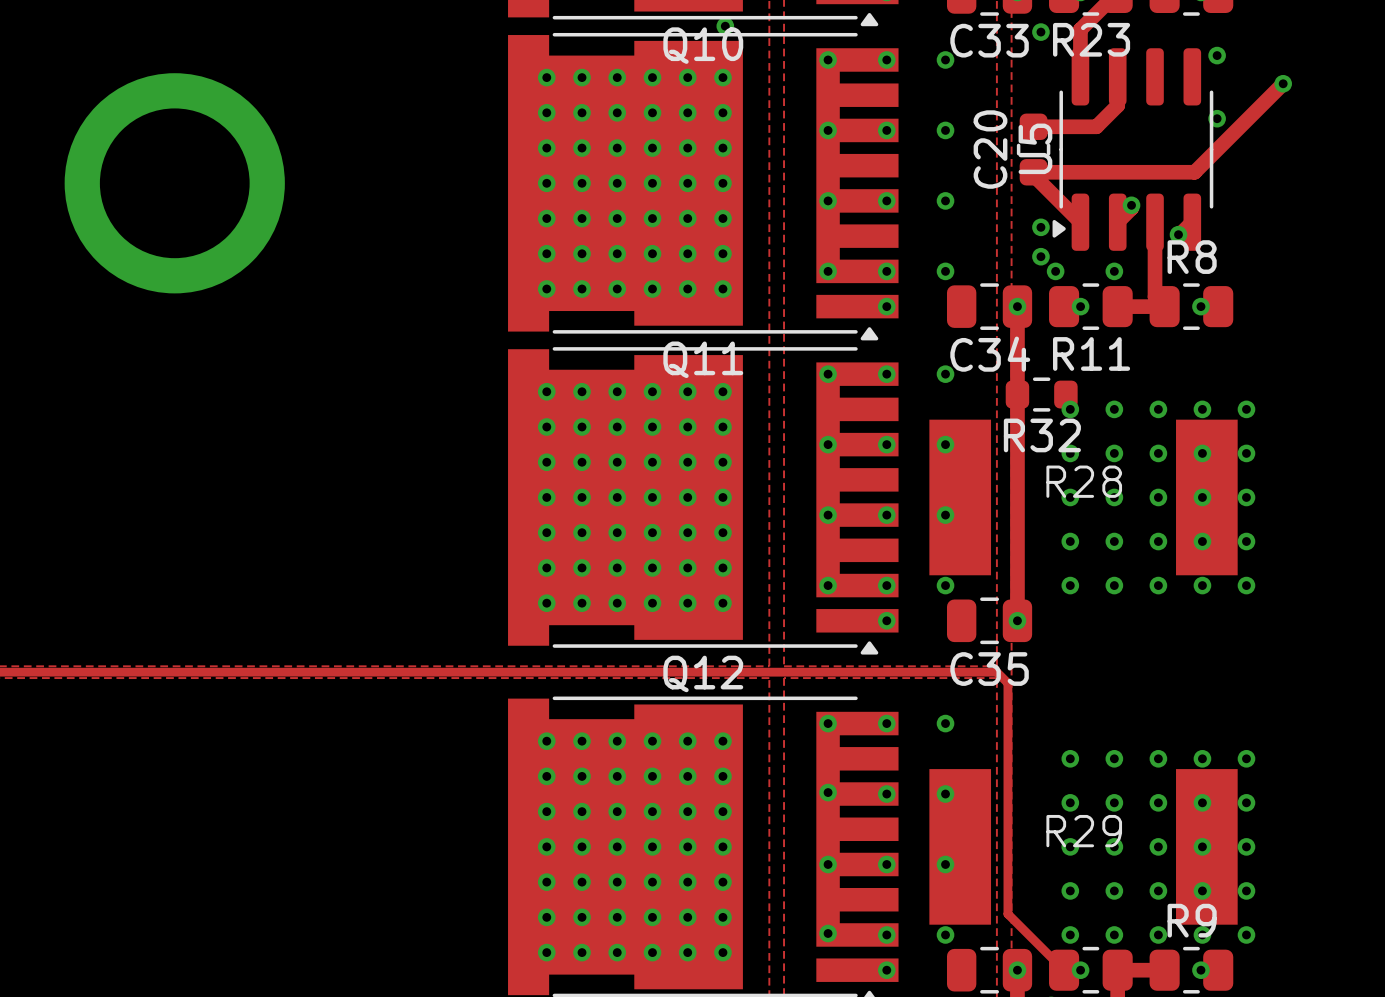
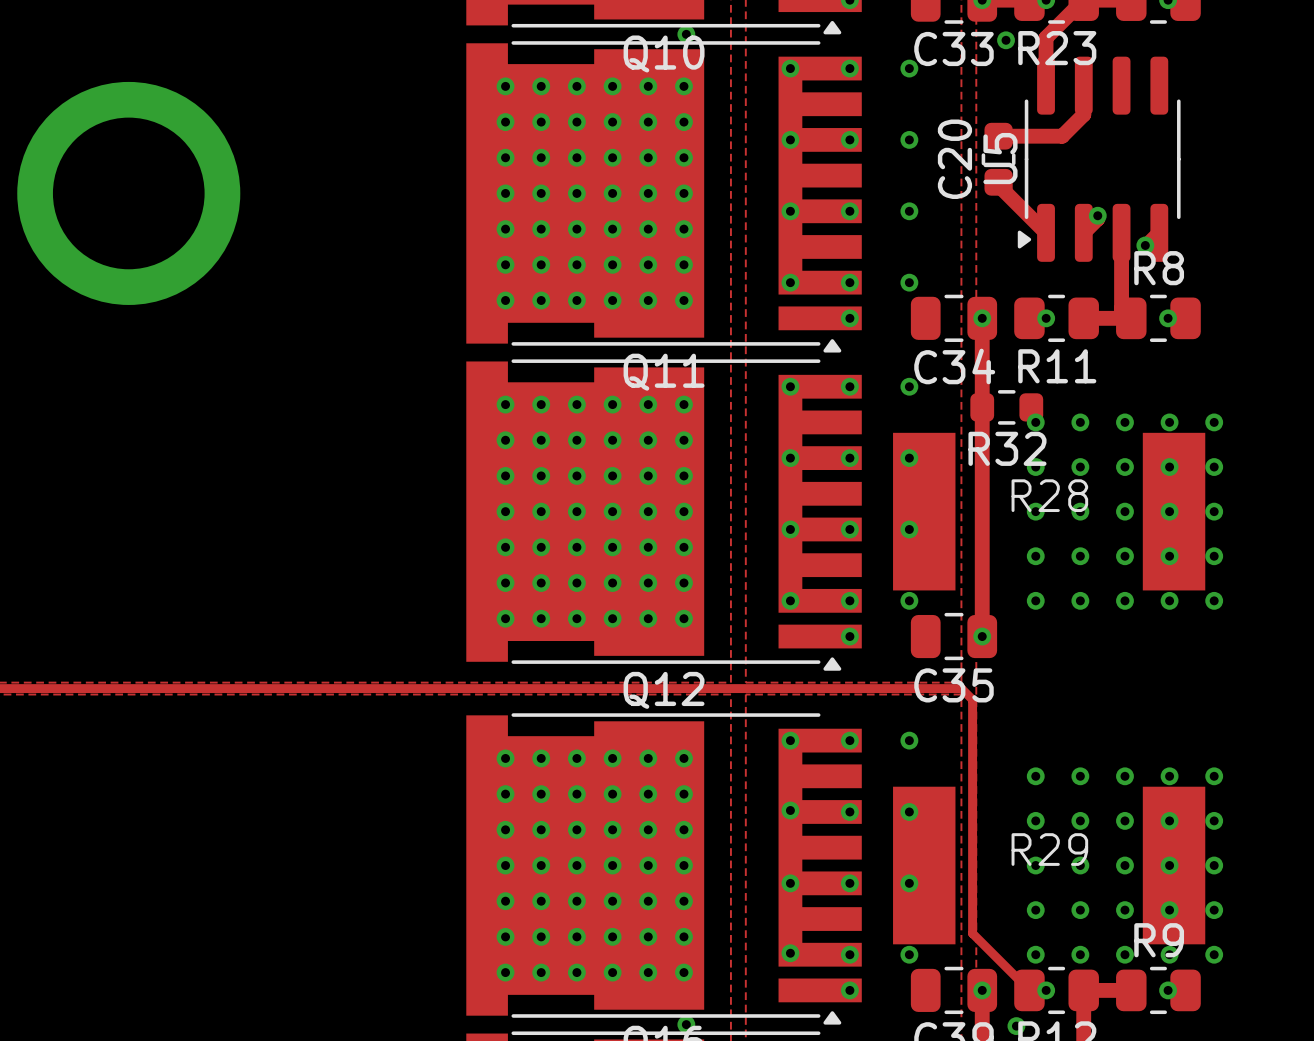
via: (1217, 55) -> none
track: (1283, 83) (1194, 172) (1033, 172) -> none
via: (1283, 83) -> none
via: (1217, 118) -> none
via: (1040, 227) -> none
via: (1040, 256) -> none
via: (1055, 271) -> none
via: (1114, 271) -> none

